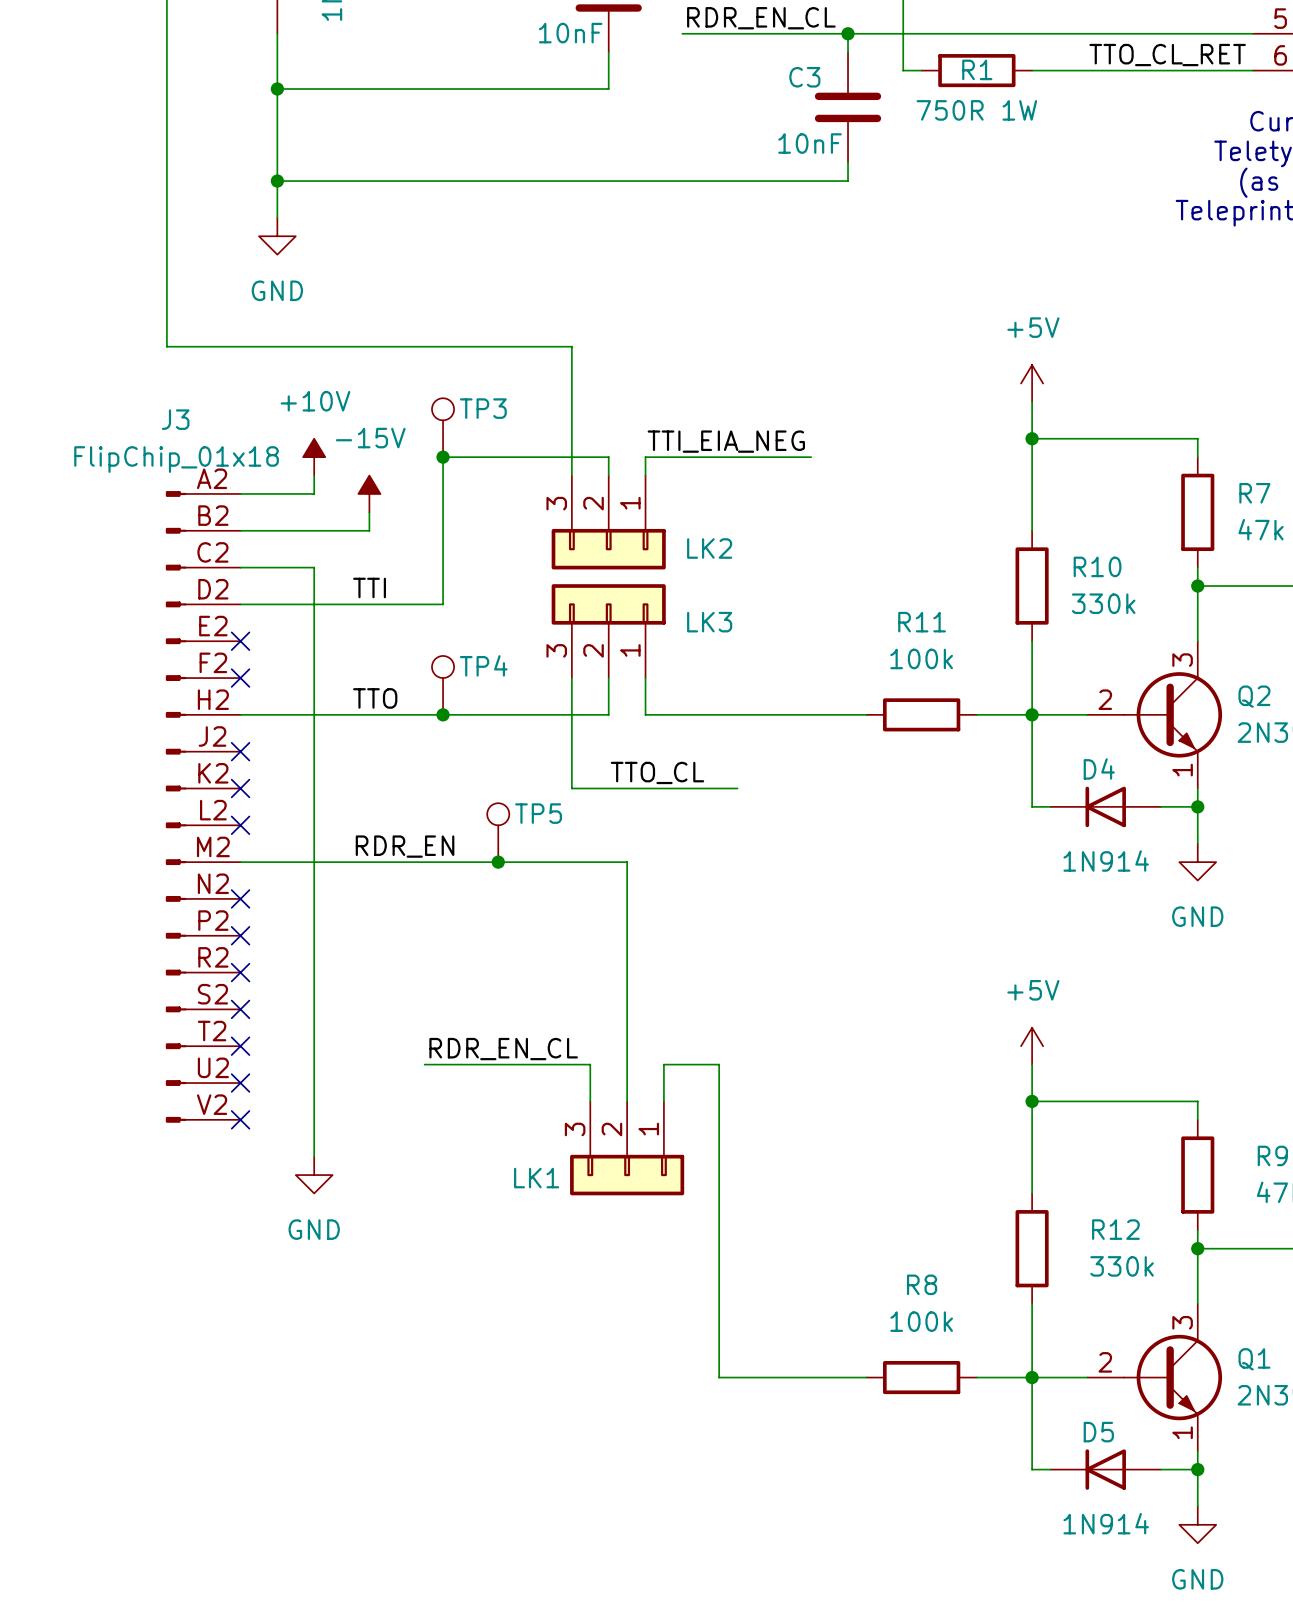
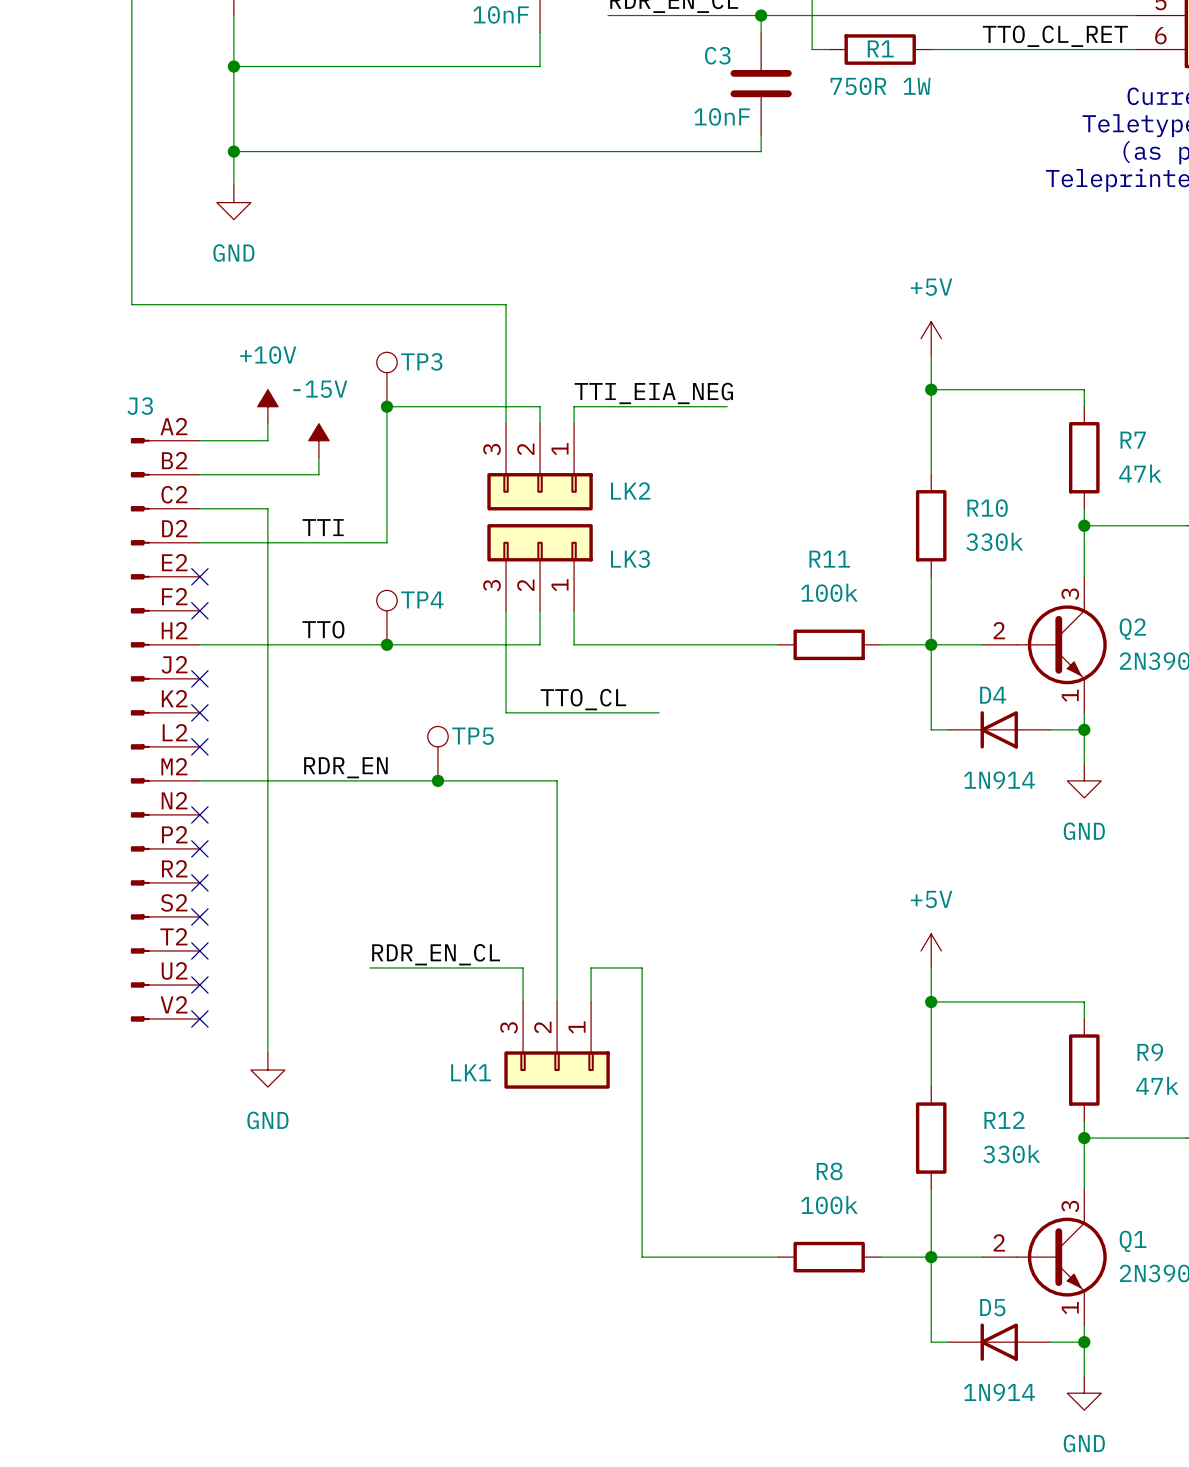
J3 name position: J3 (175, 419) -> J3 (140, 406)
J3 value: FlipChip_01x18 (176, 459) -> none

